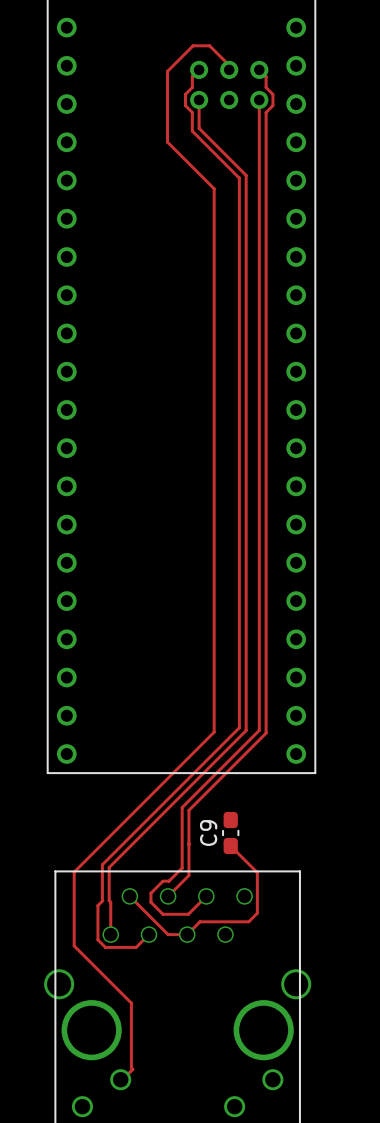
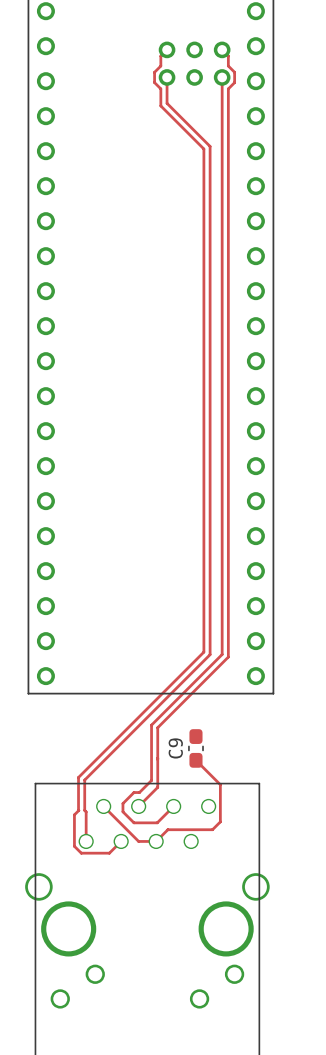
top track: (229, 69) (229, 65) (209, 45) (193, 45) (167, 71) (167, 142) (214, 188) (214, 732) (74, 872) (74, 945) (131, 1003) (132, 1069) (120, 1079) -> none

